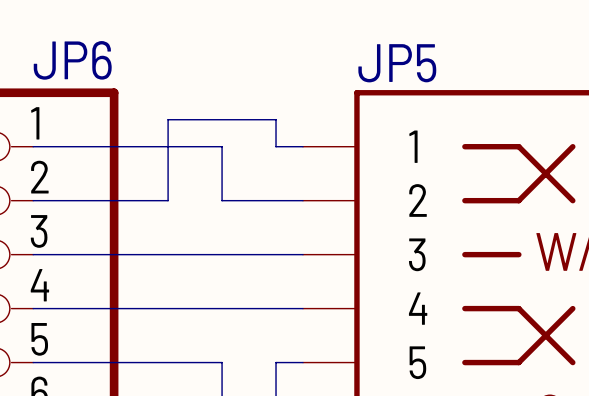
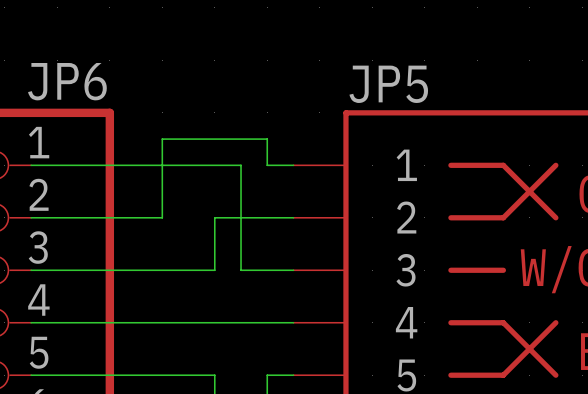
wire: (222, 146) (222, 200) -> (214, 165) (241, 165) (241, 270)
wire: (222, 254) (249, 254) -> (214, 270) (214, 217)

